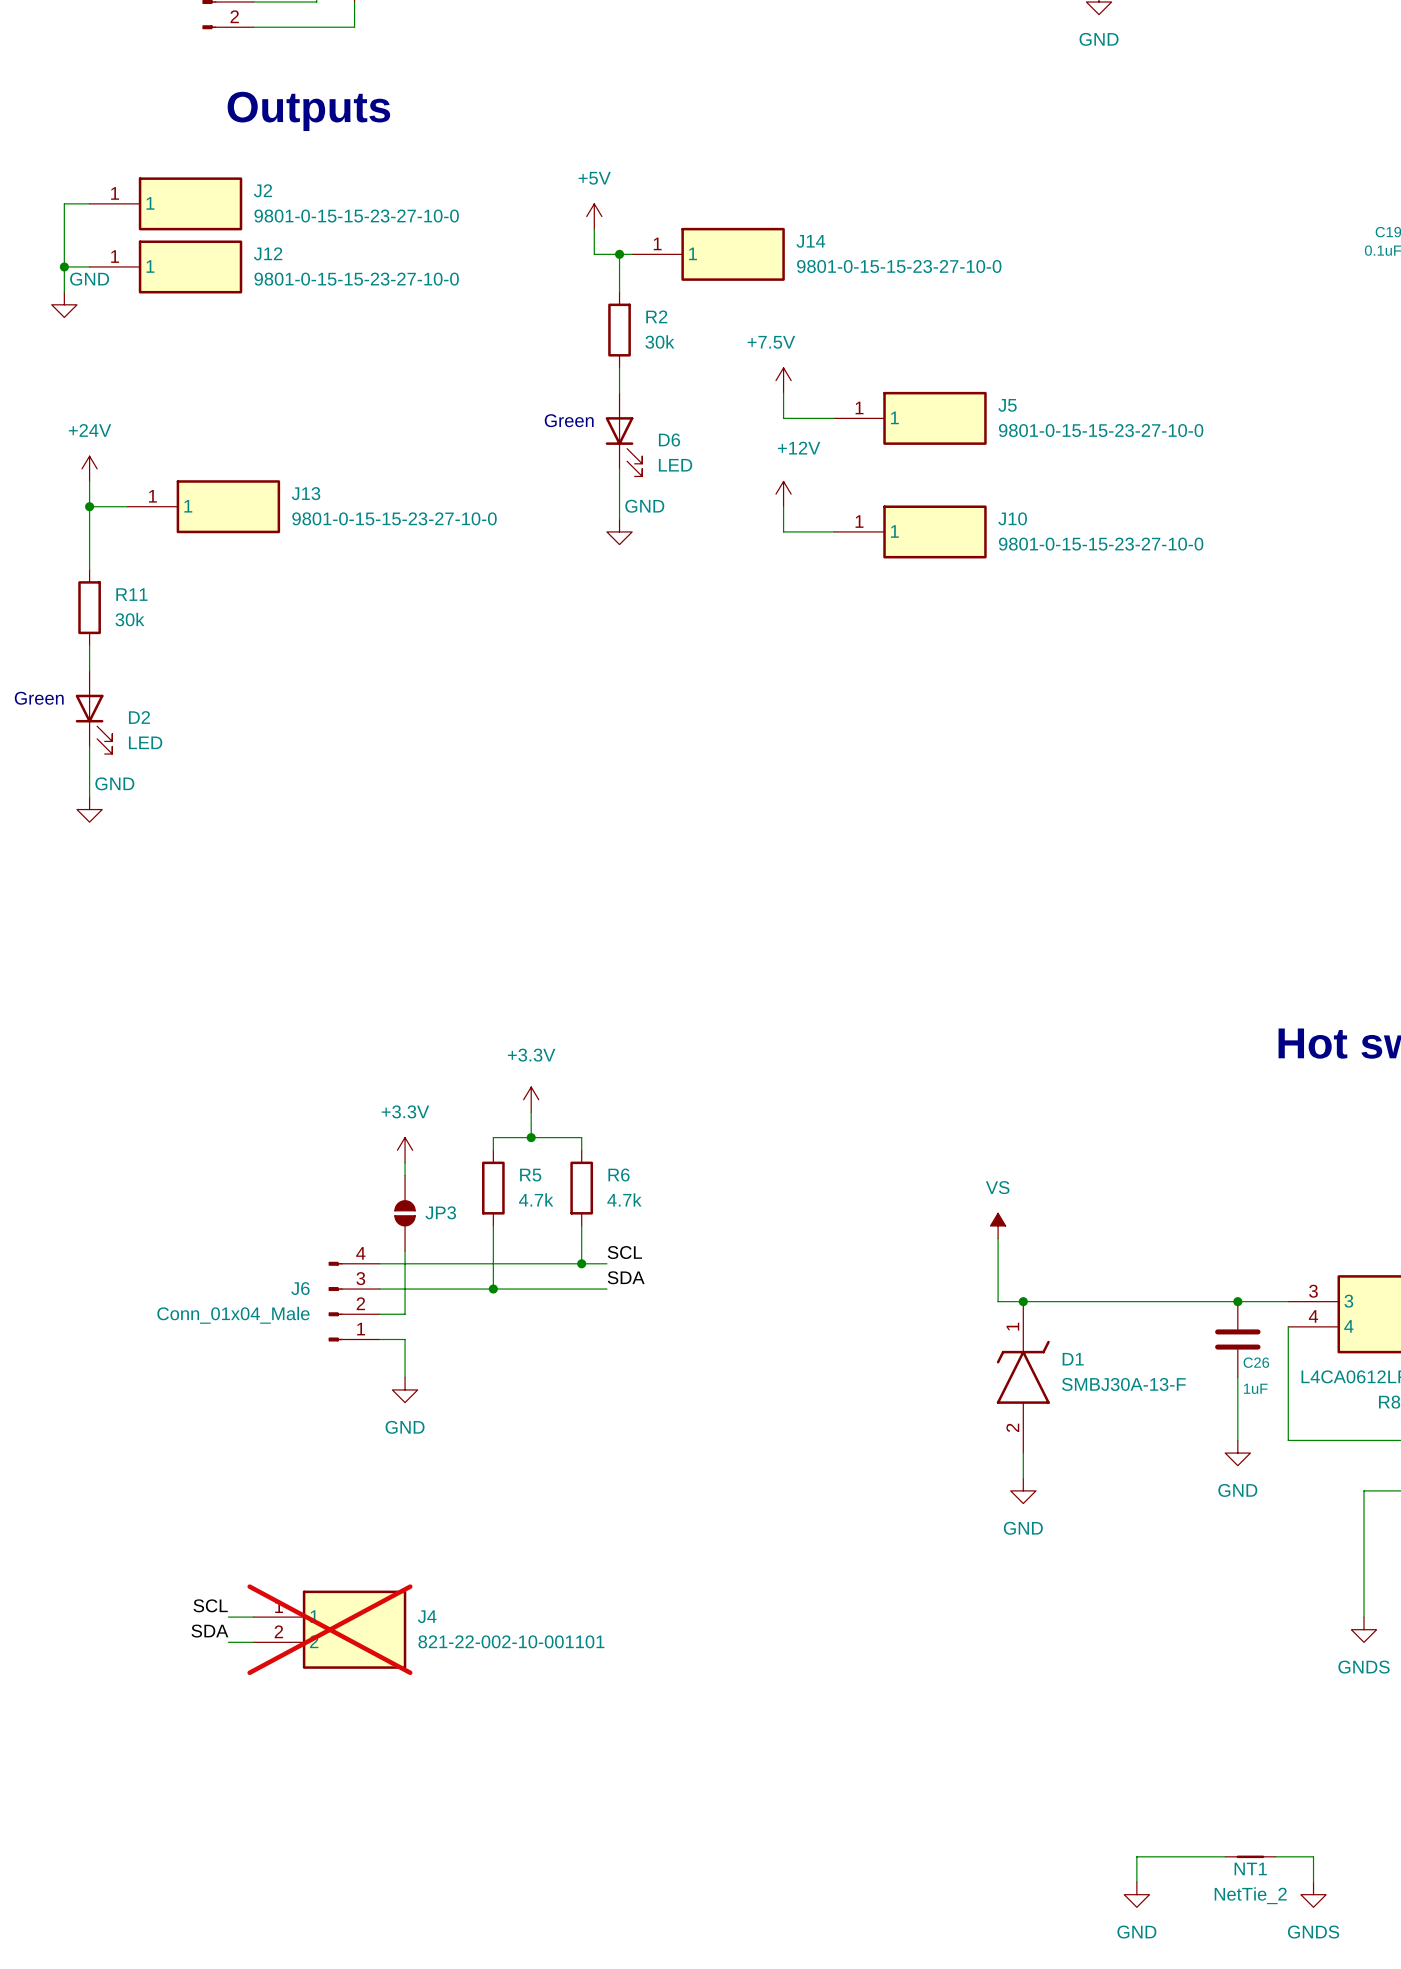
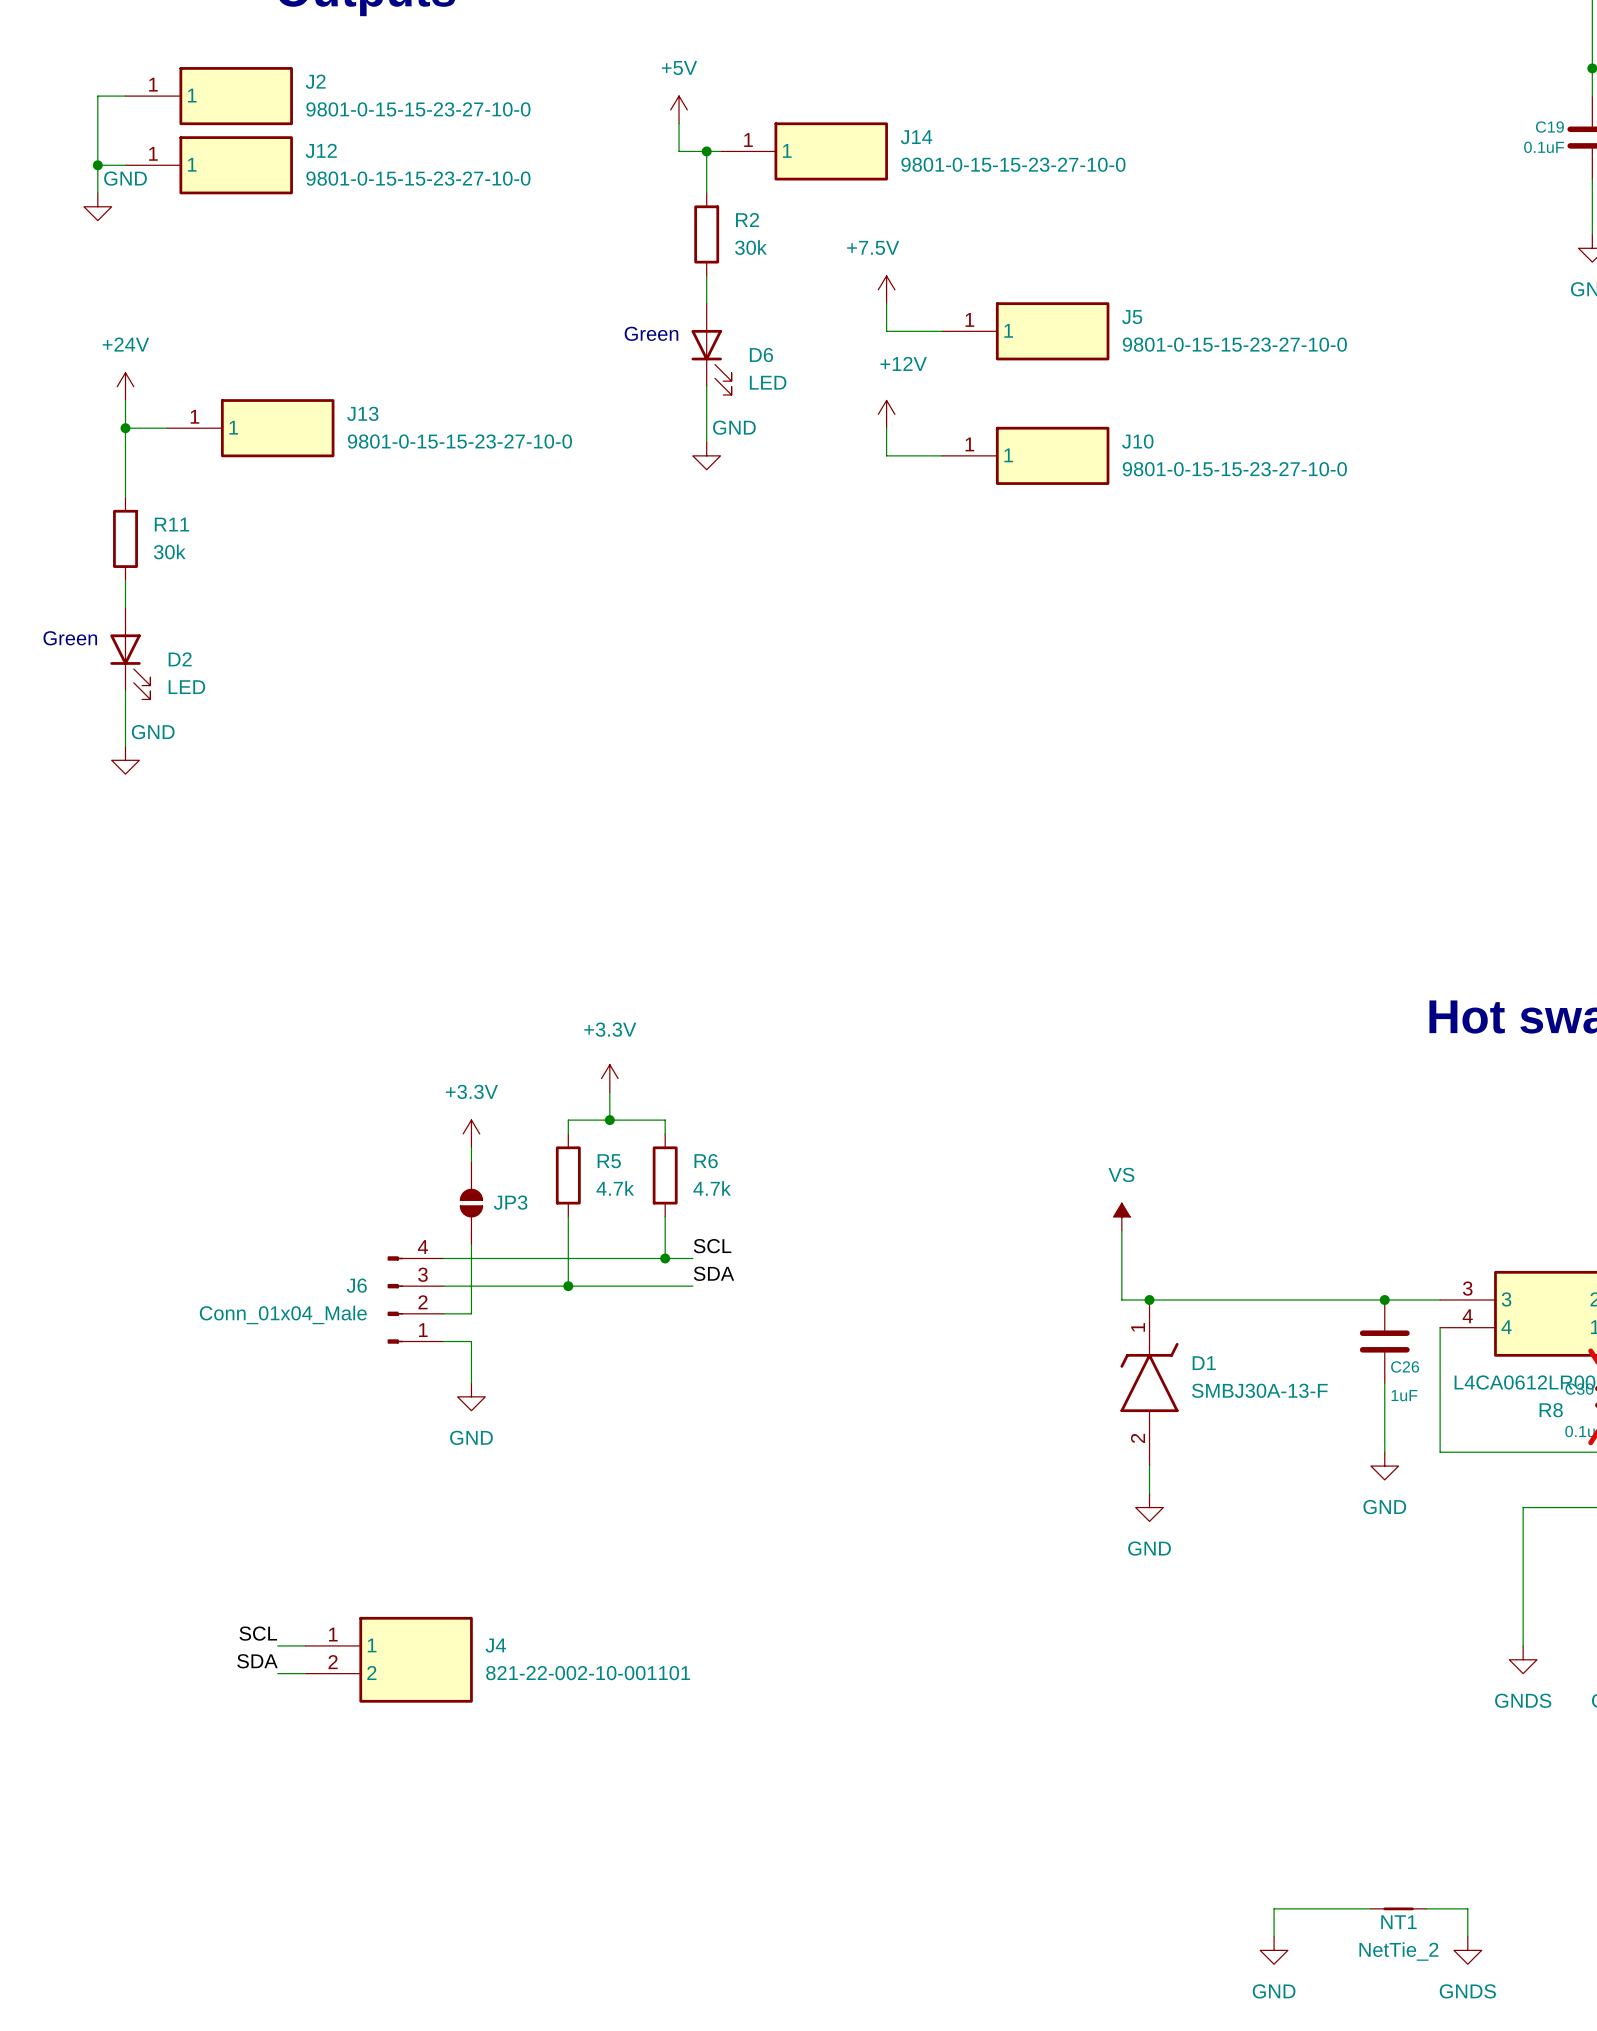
J4 do-not-place cross: (329, 1629) -> none

